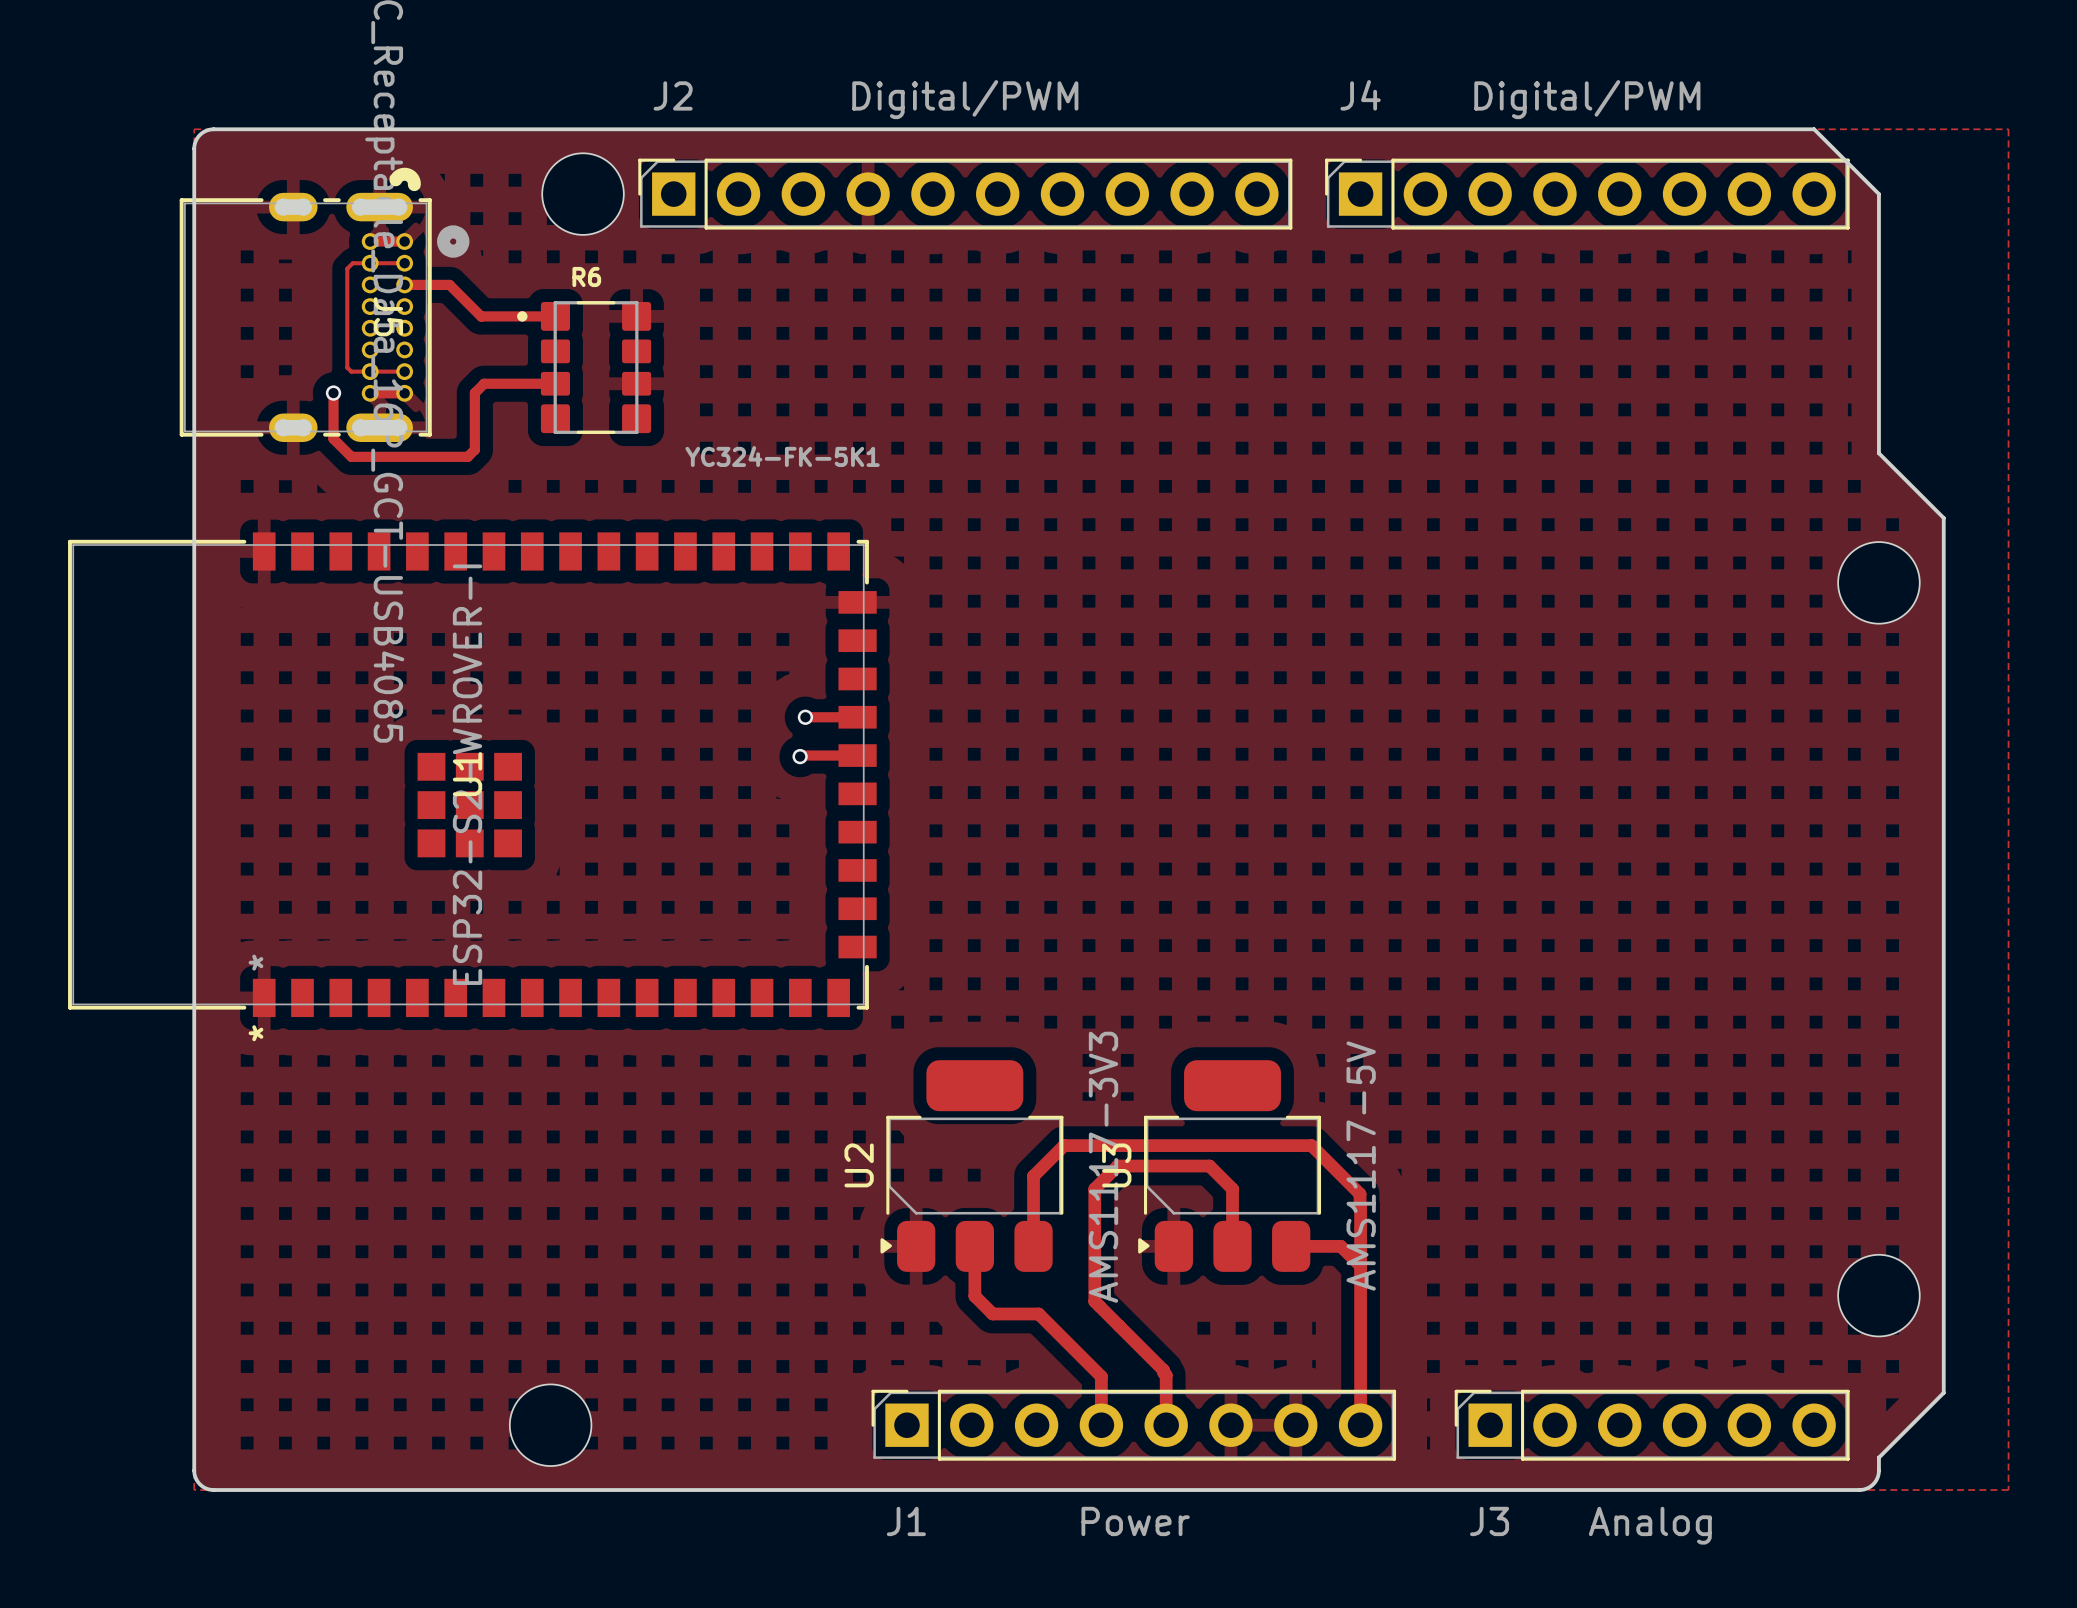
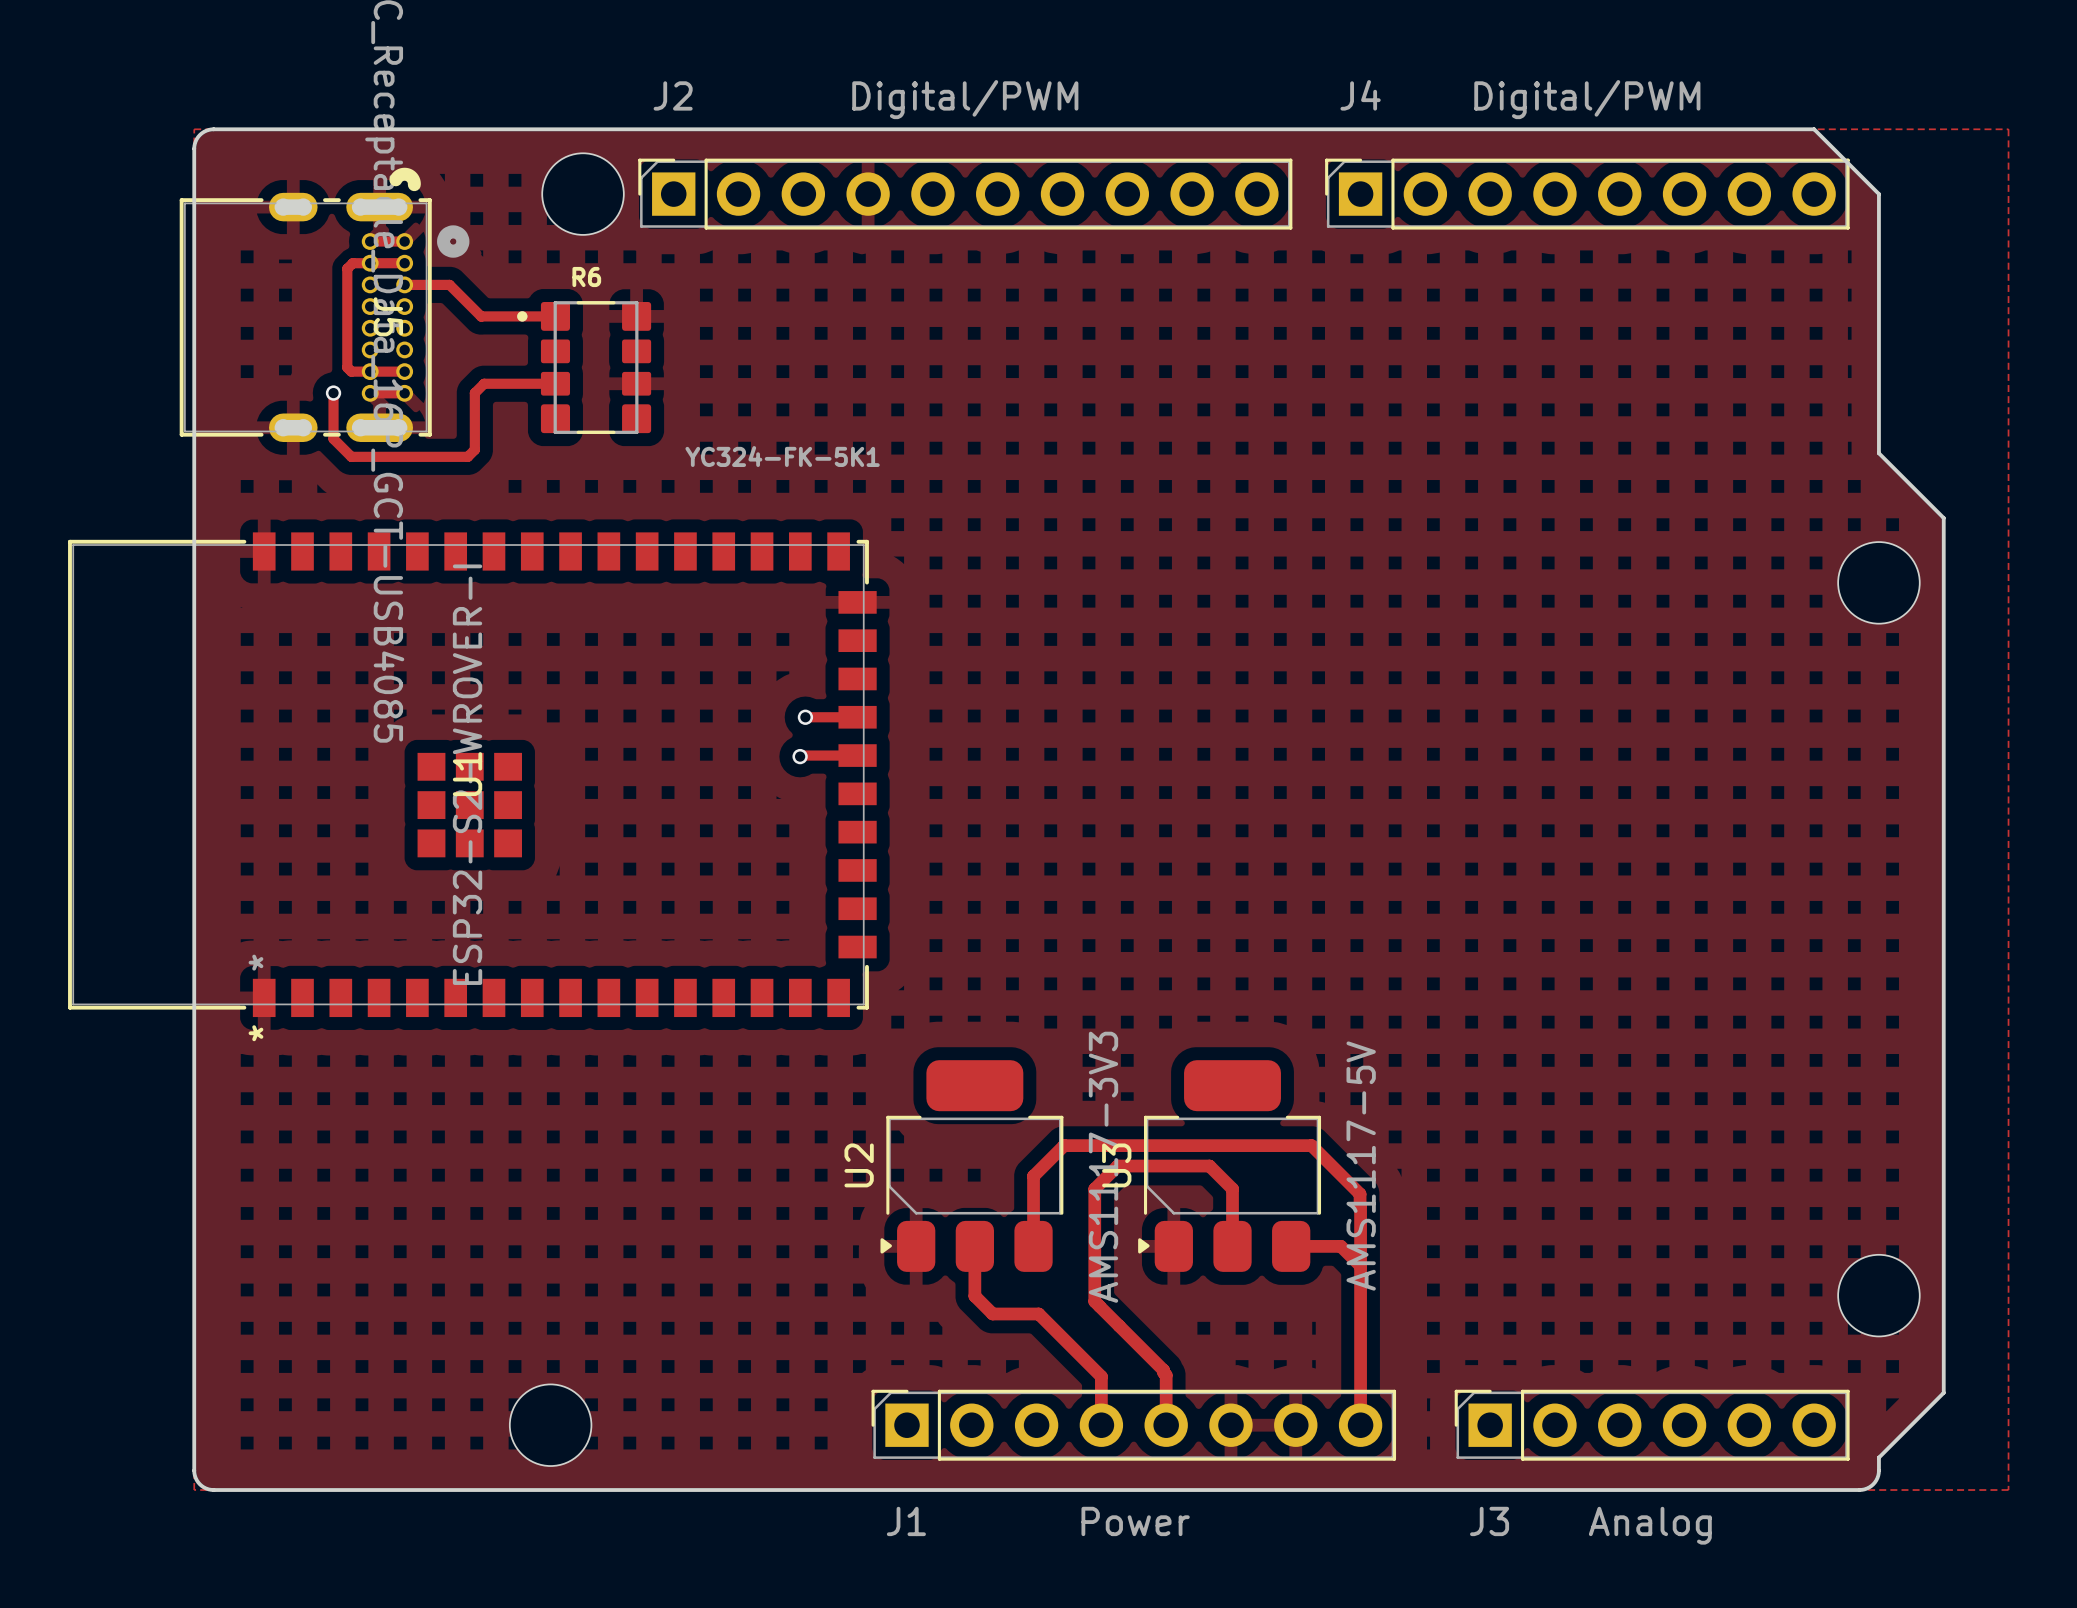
track width: thin (404, 263) (352, 263) (347, 268) (347, 367) (351, 371) (404, 371) -> thick (404, 263) (352, 263) (347, 268) (347, 367) (351, 371) (404, 371)

